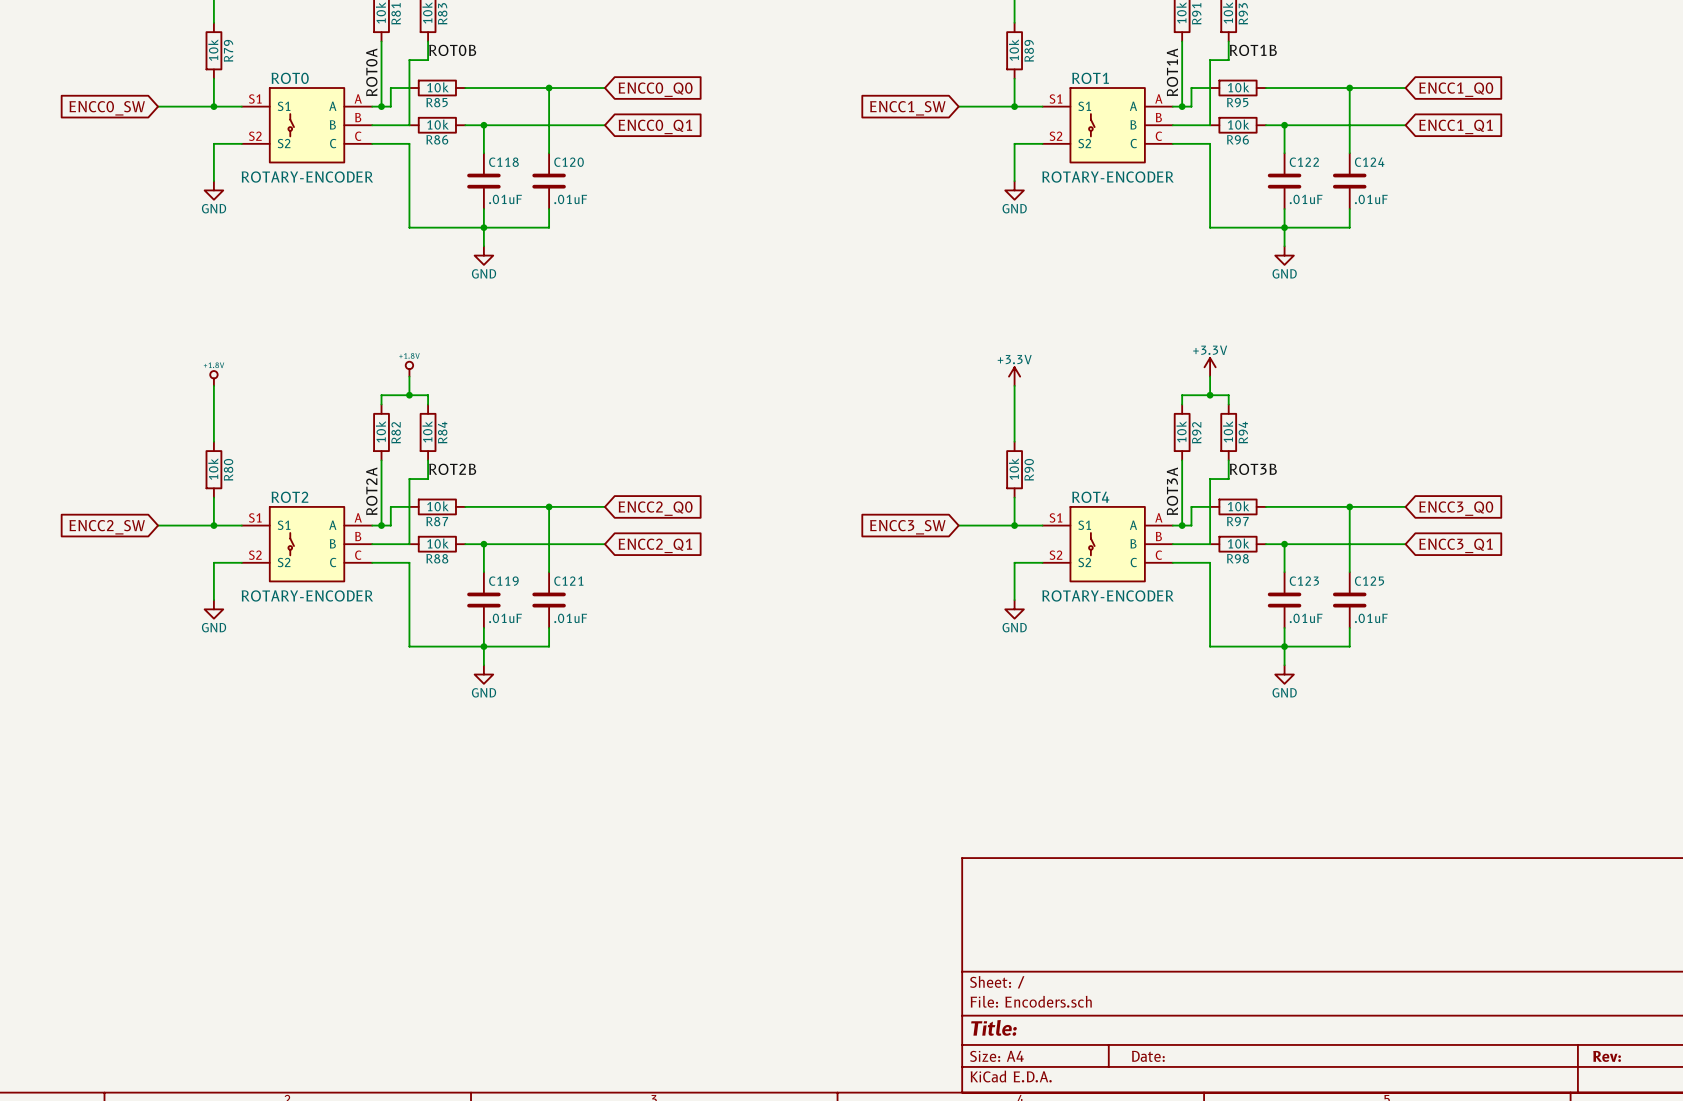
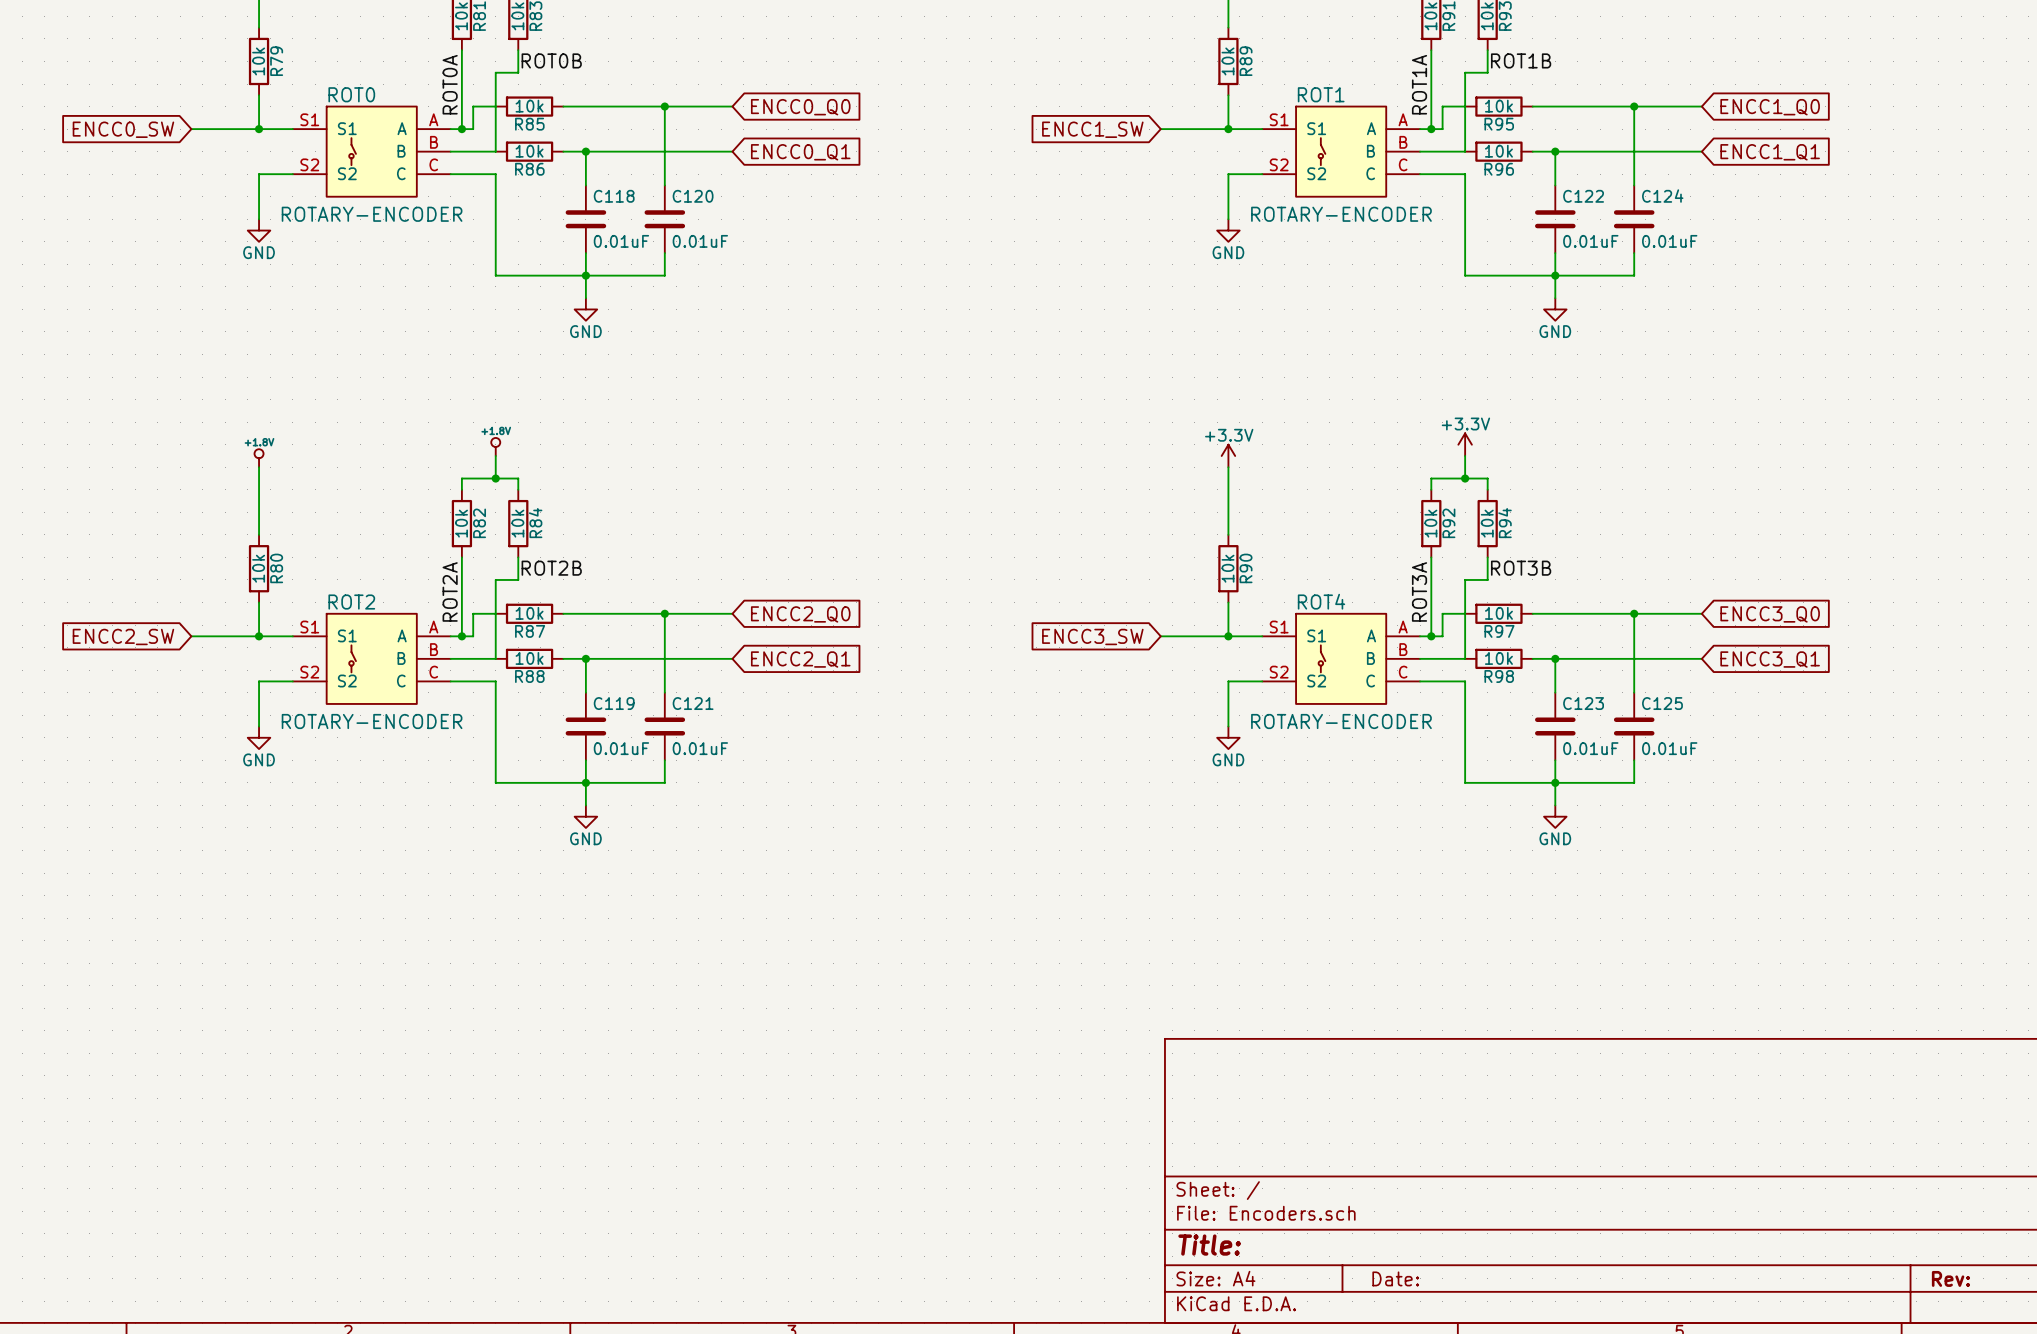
C118 value: .01uF (505, 199) -> 0.01uF (621, 241)
C120 value: .01uF (570, 199) -> 0.01uF (700, 241)
C122 value: .01uF (1306, 199) -> 0.01uF (1590, 241)
C124 value: .01uF (1371, 199) -> 0.01uF (1669, 241)
C119 value: .01uF (505, 618) -> 0.01uF (621, 748)
C121 value: .01uF (570, 618) -> 0.01uF (700, 748)
C123 value: .01uF (1306, 618) -> 0.01uF (1590, 748)
C125 value: .01uF (1371, 618) -> 0.01uF (1669, 748)

